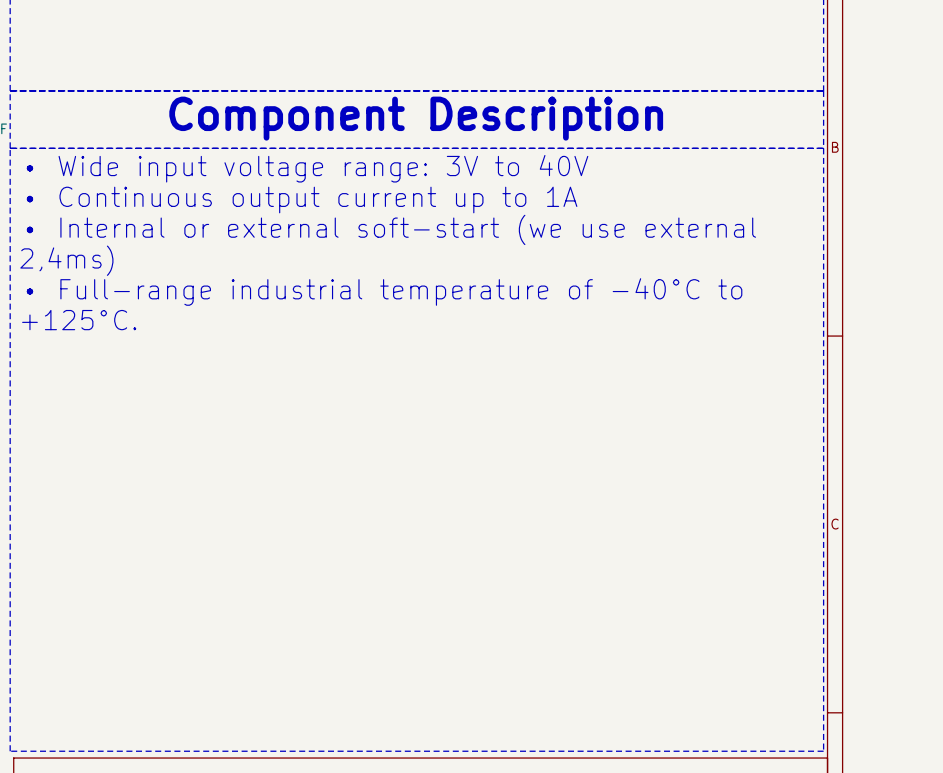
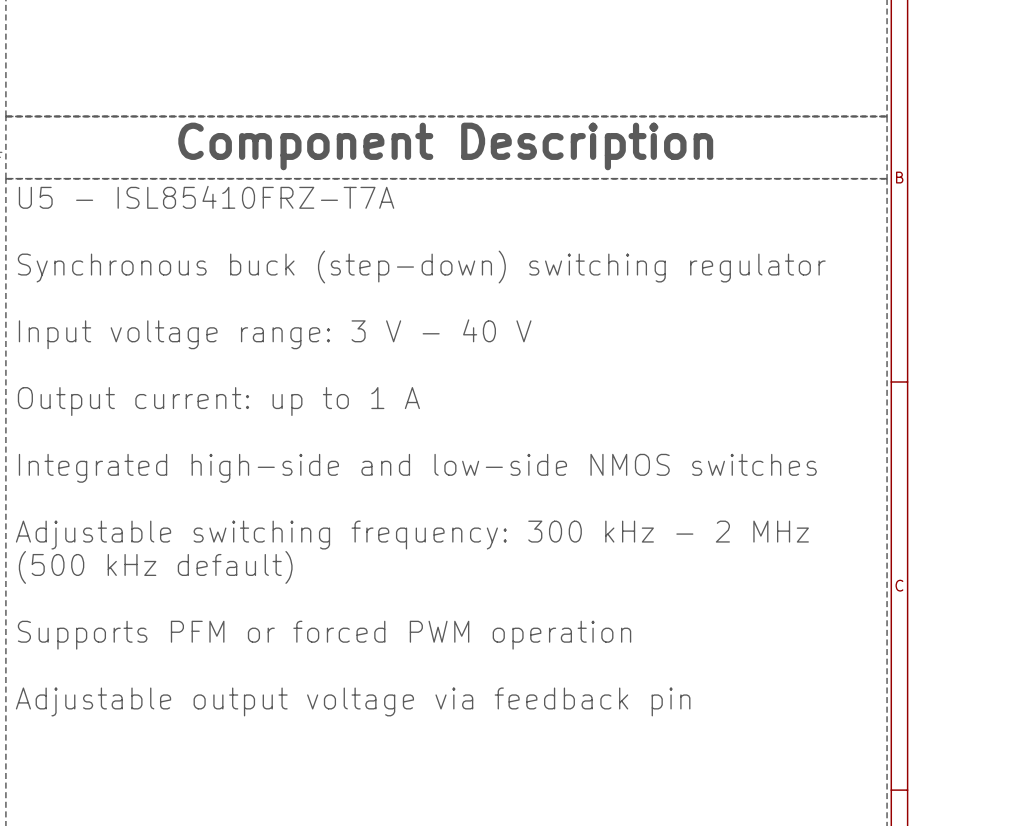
text: • Wide input voltage range: 3V to 40V (307, 168) -> U5 - ISL85410FRZ-T7A (206, 197)
text: • Continuous output current up to 1A (302, 200) -> none
text: • Internal or external soft-start (we use external (391, 229) -> Synchronous buck (step-down) switching regulator (421, 267)
text: 2,4ms) (66, 260) -> none
text: • Full-range industrial temperature of -40°C to (384, 292) -> Input voltage range: 3 V - 40 V (275, 334)
text: +125°C. (79, 320) -> none
text: none -> Output current: up to 1 A (218, 401)
text: none -> Integrated high-side and low-side NMOS switches (417, 468)
text: none -> Adjustable switching frequency: 300 kHz - 2 MHz (412, 535)
text: none -> (500 kHz default) (155, 567)
text: none -> Supports PFM or forced PWM operation (324, 635)
text: none -> Adjustable output voltage via feedback pin (353, 701)

